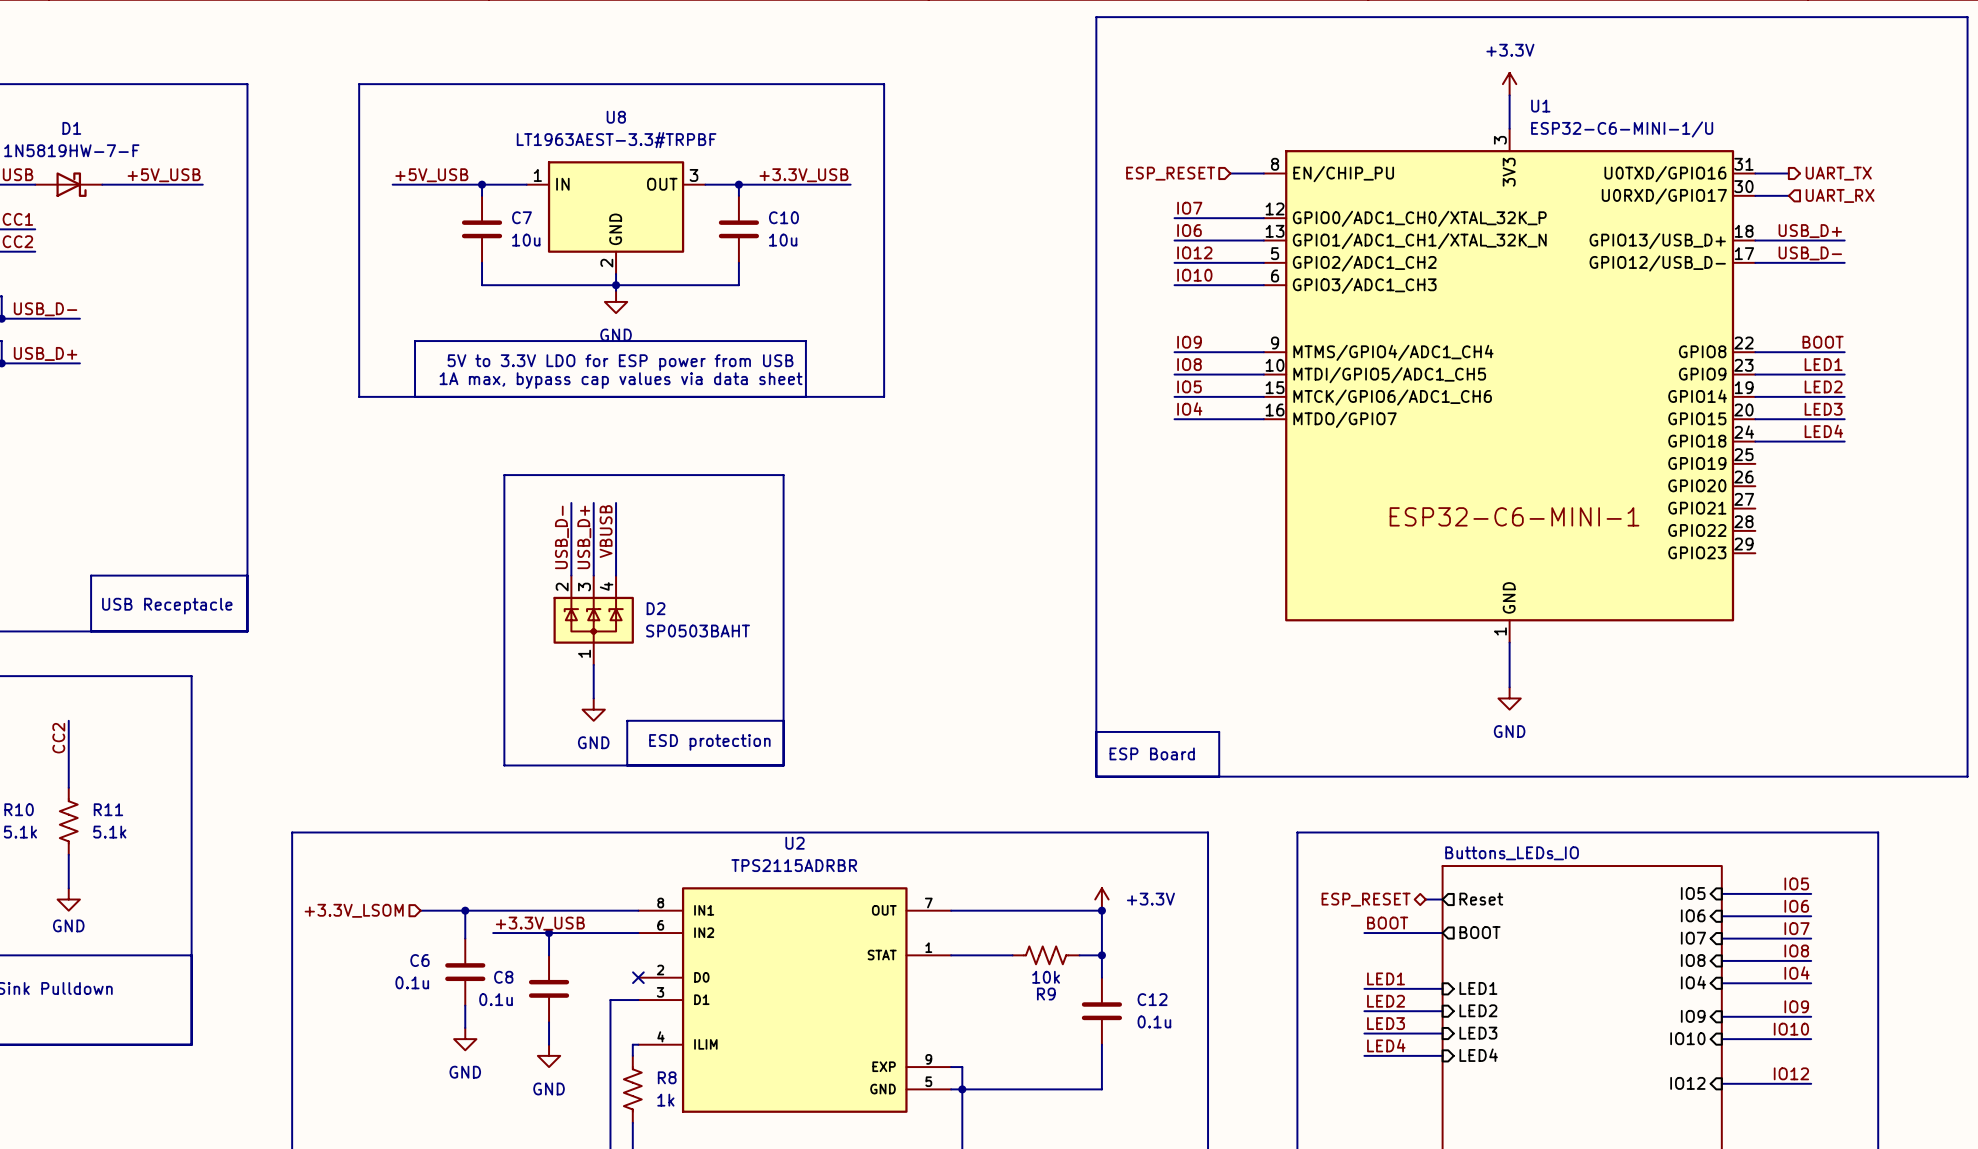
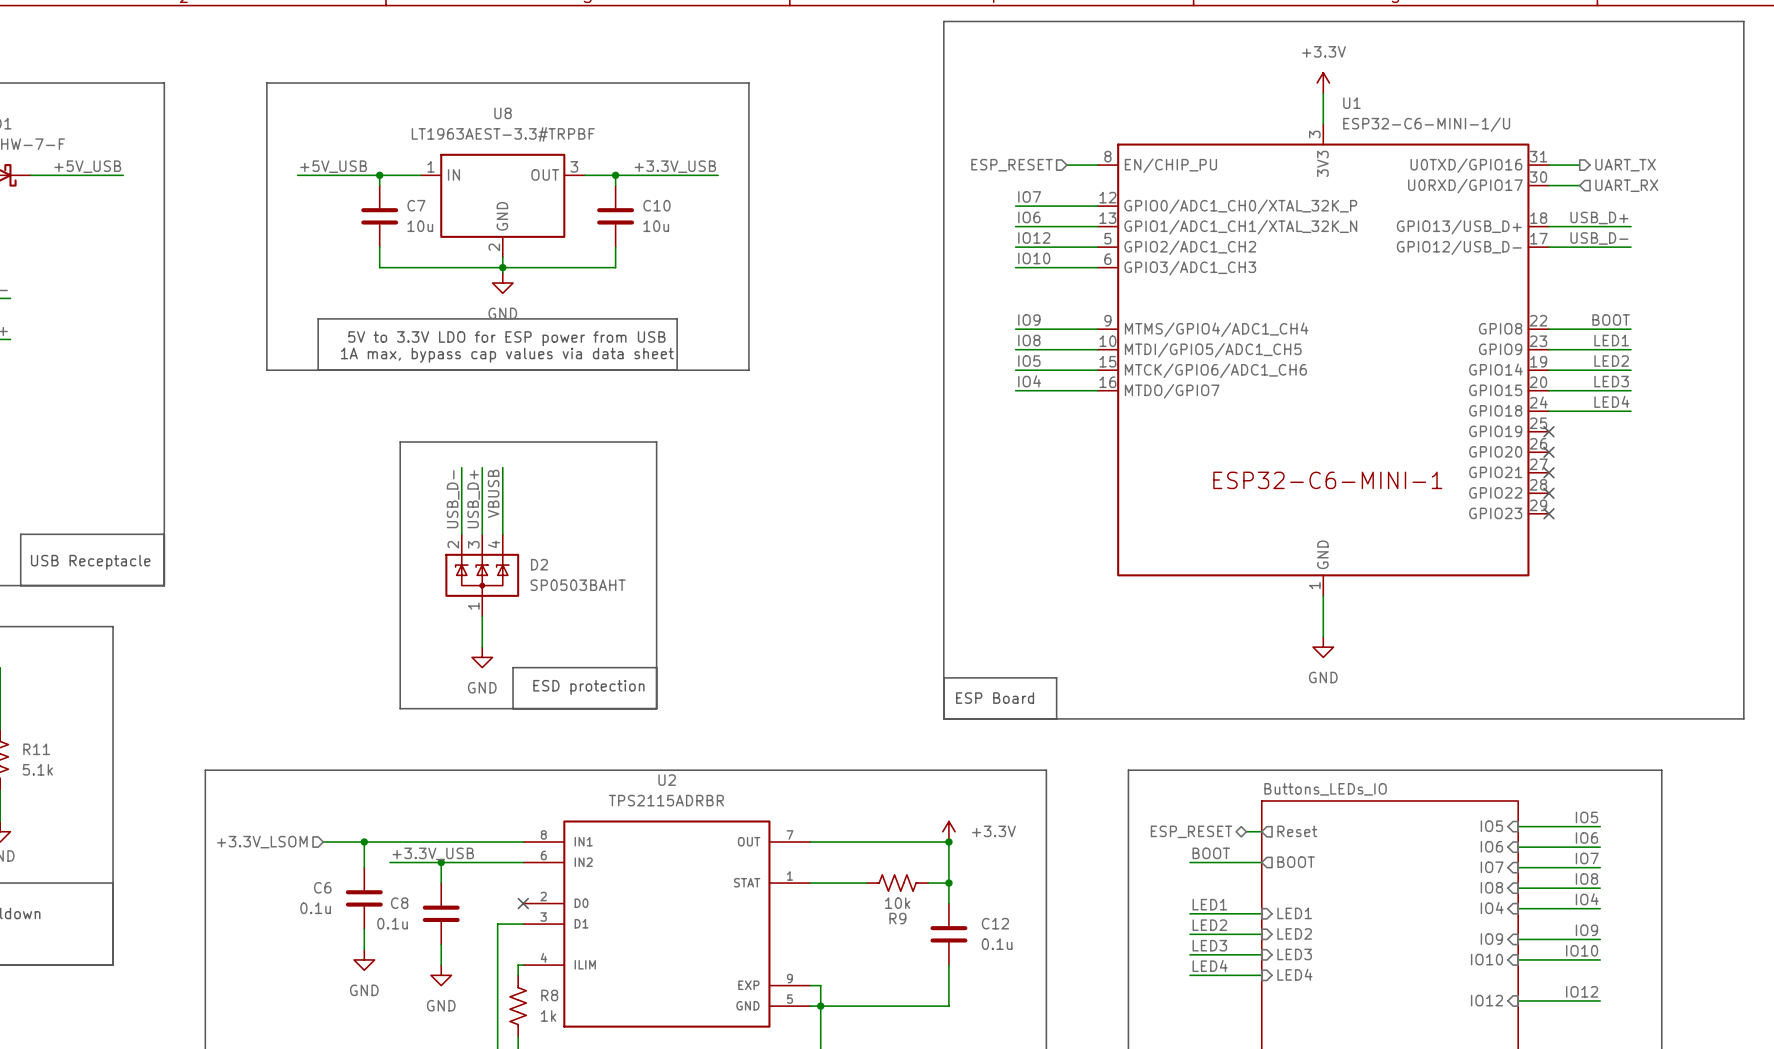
no-connect mark: none -> (1548, 431)
no-connect mark: none -> (1548, 452)
no-connect mark: none -> (1548, 472)
no-connect mark: none -> (1548, 493)
no-connect mark: none -> (1548, 513)

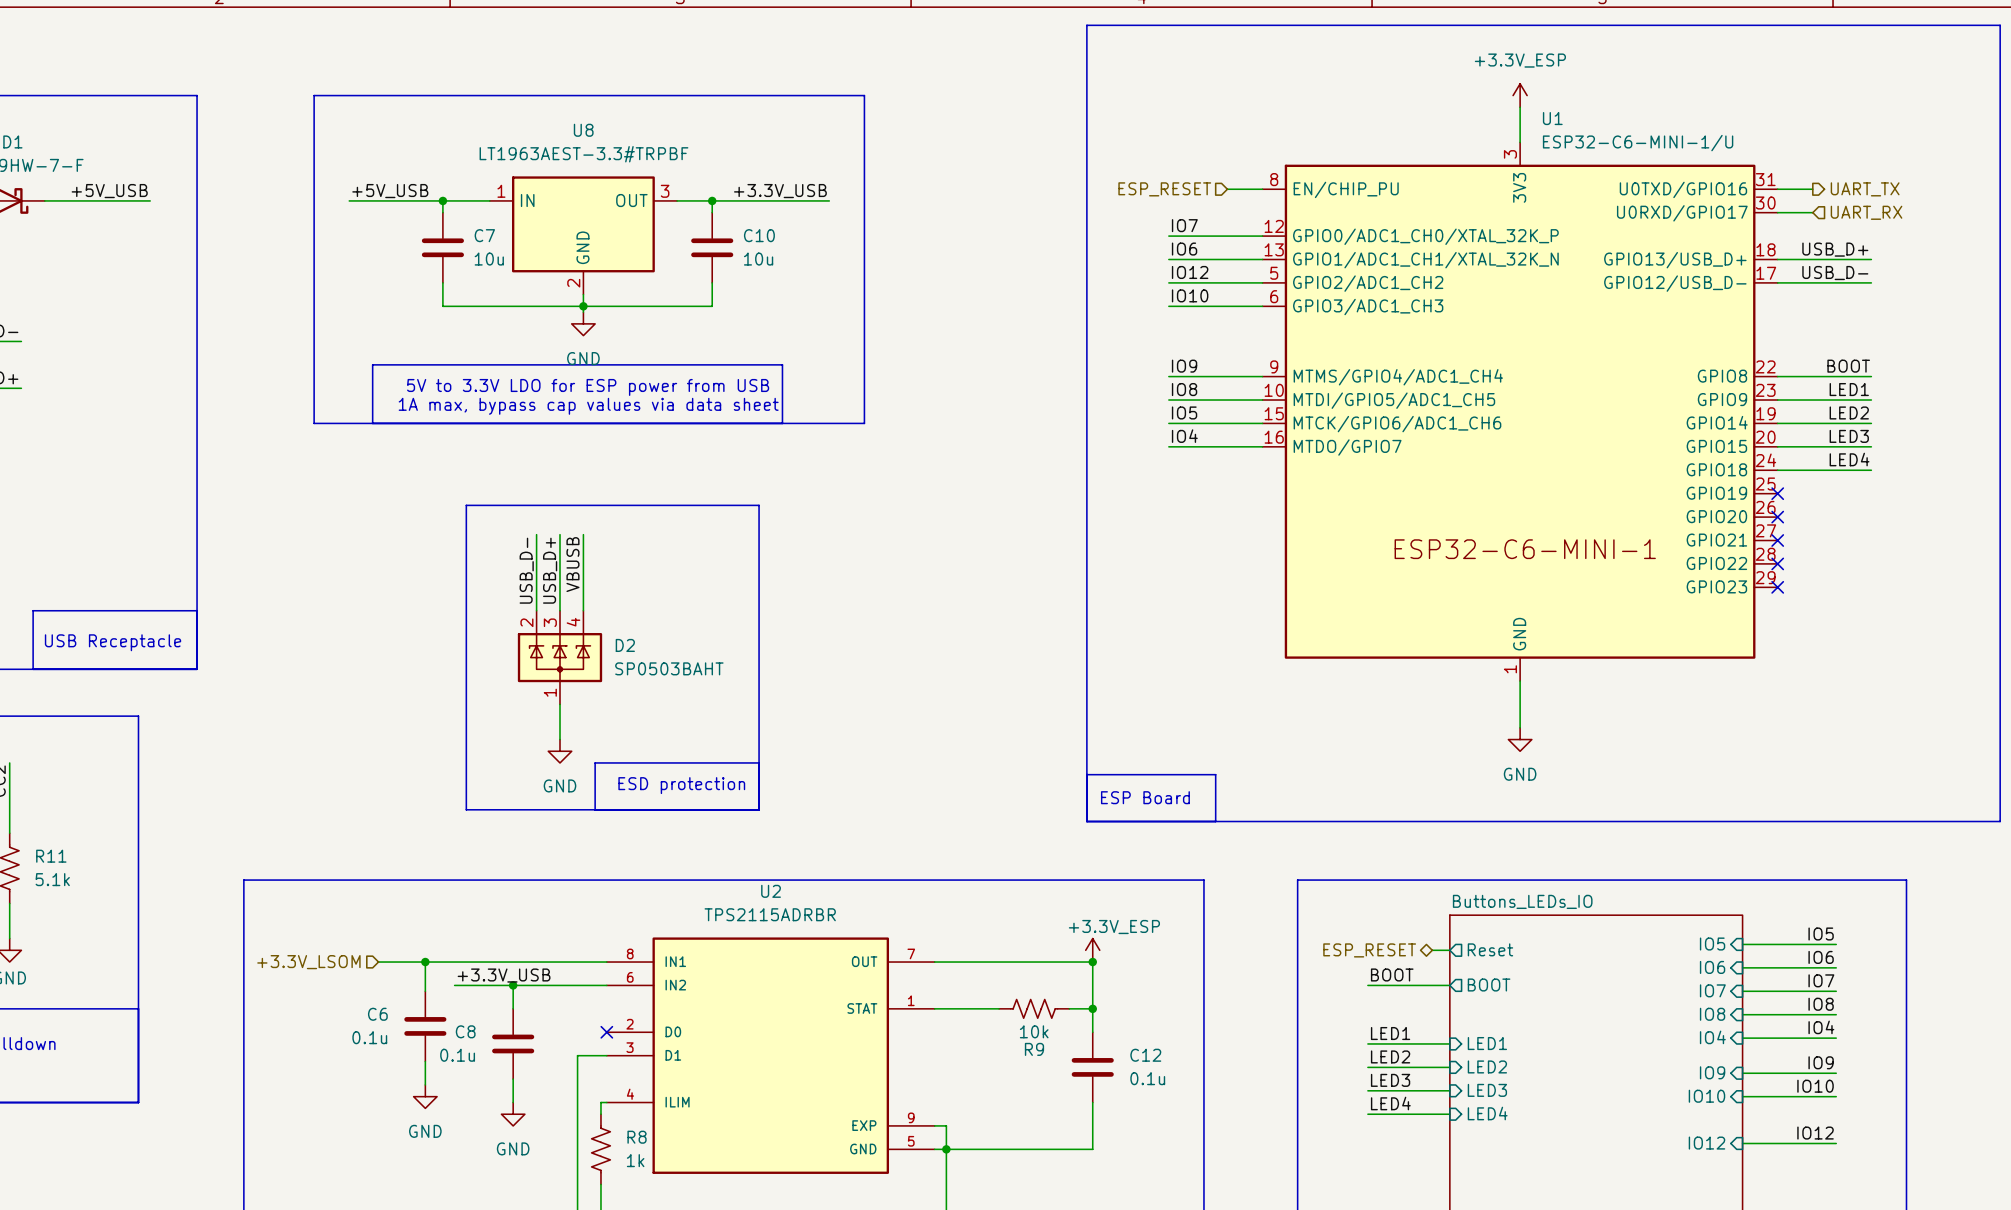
power symbol: +3.3V (1323, 83) -> +3.3V_ESP (1520, 95)
power symbol: +3.3V (948, 831) -> +3.3V_ESP (1092, 950)

